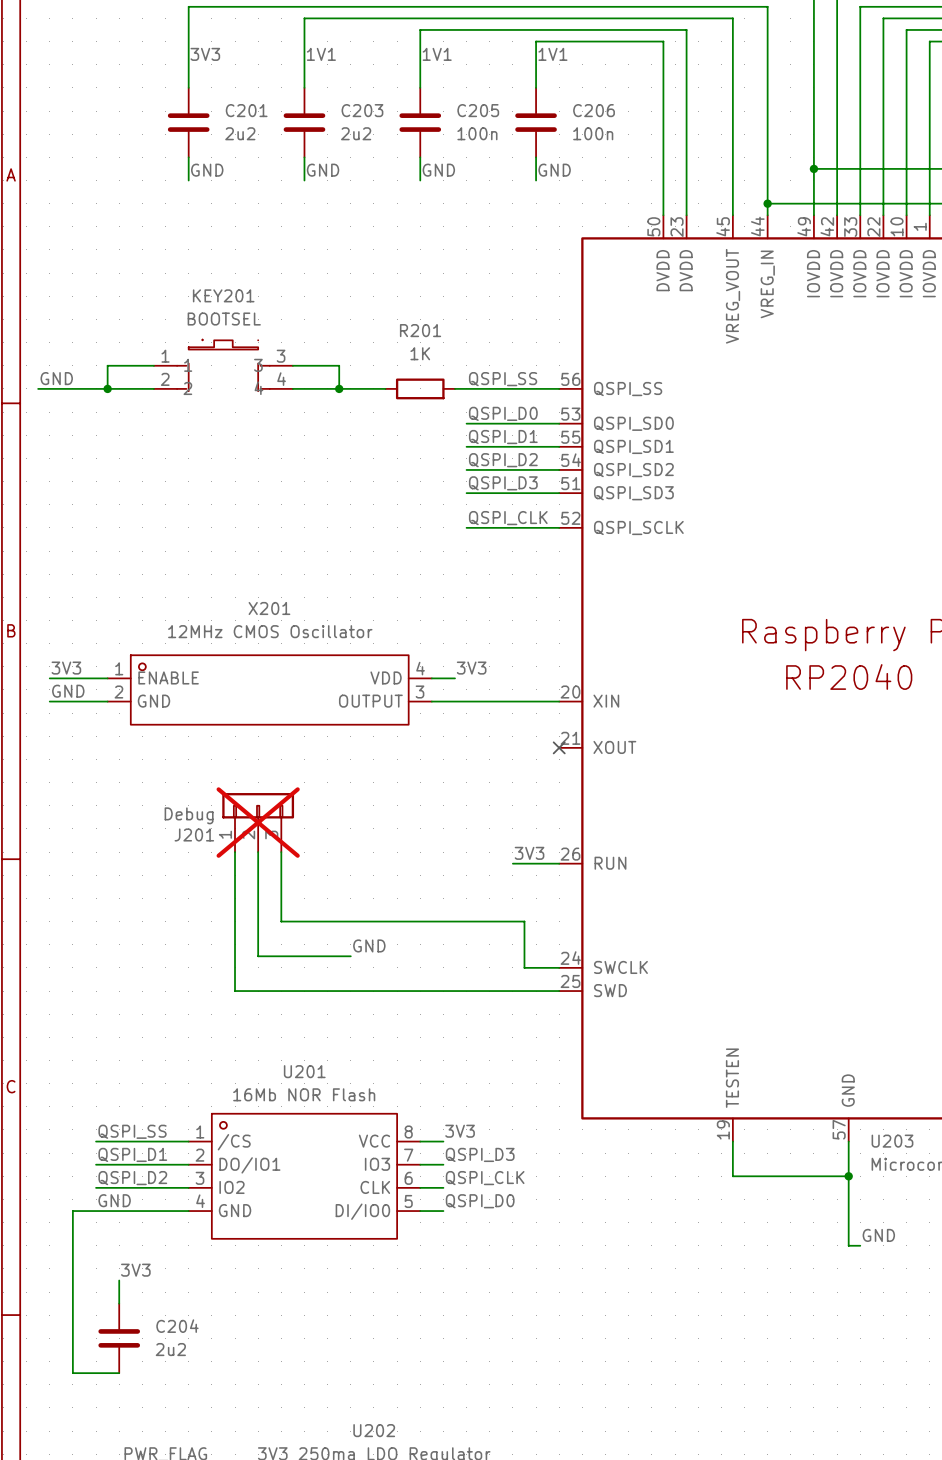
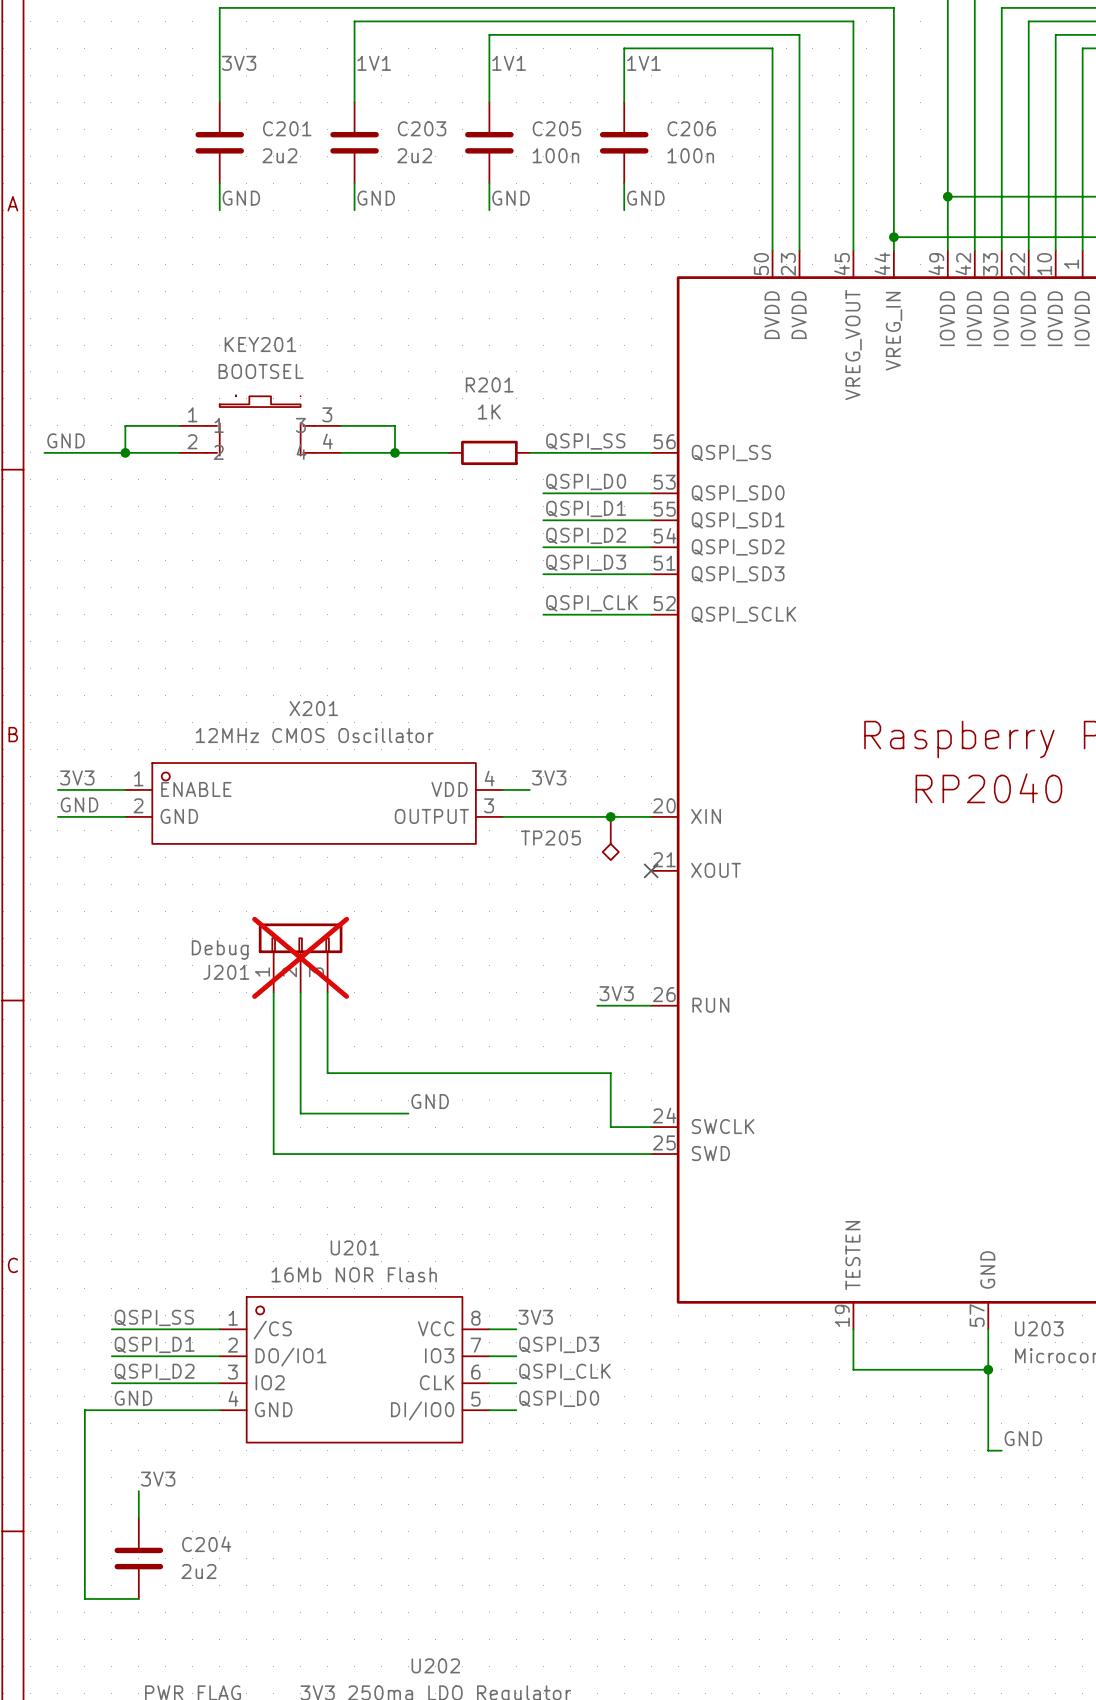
junction: none -> (610, 816)
TP205: none -> (610, 838)

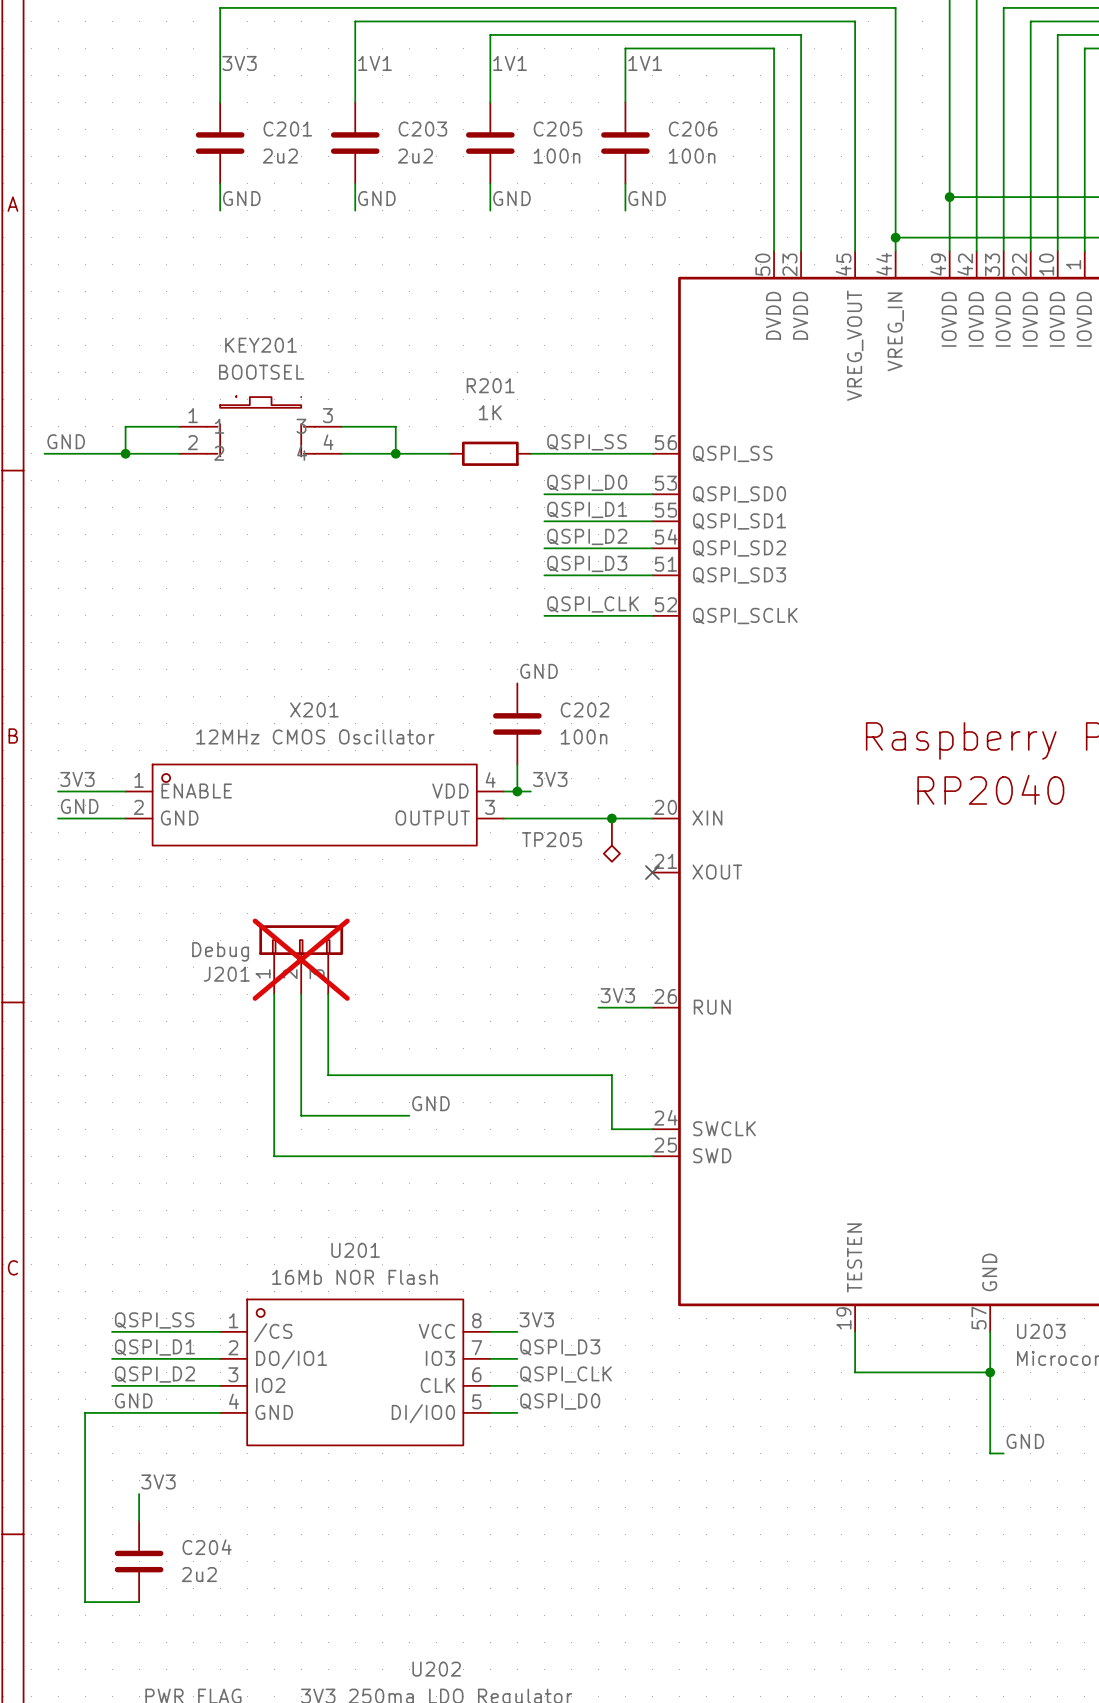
label: none -> GND (539, 671)
C202: none -> 100n (517, 723)
wire: none -> (517, 764) (517, 791)
junction: none -> (517, 791)

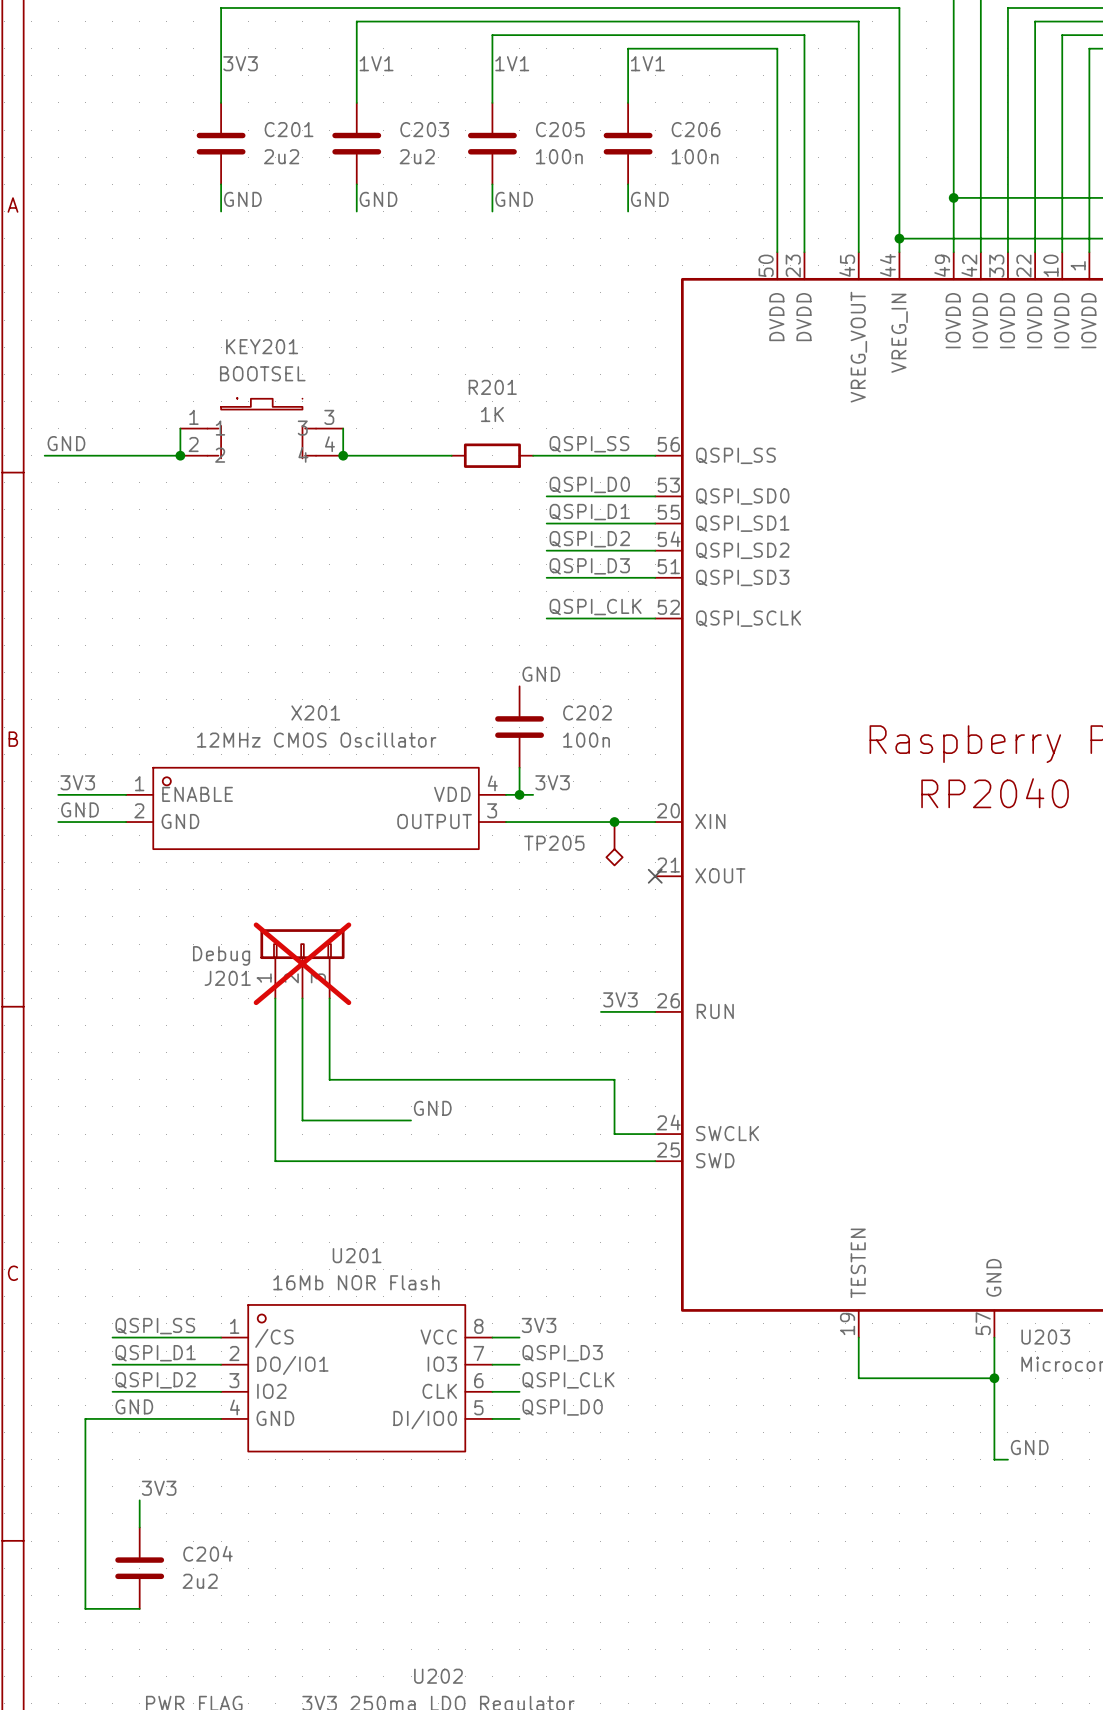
wire: (179, 426) (125, 426) (125, 453) -> (180, 428) (180, 455)
wire: (341, 426) (395, 426) (395, 453) -> (343, 428) (343, 455)
junction position: (125, 453) -> (180, 455)
junction position: (395, 453) -> (343, 455)

